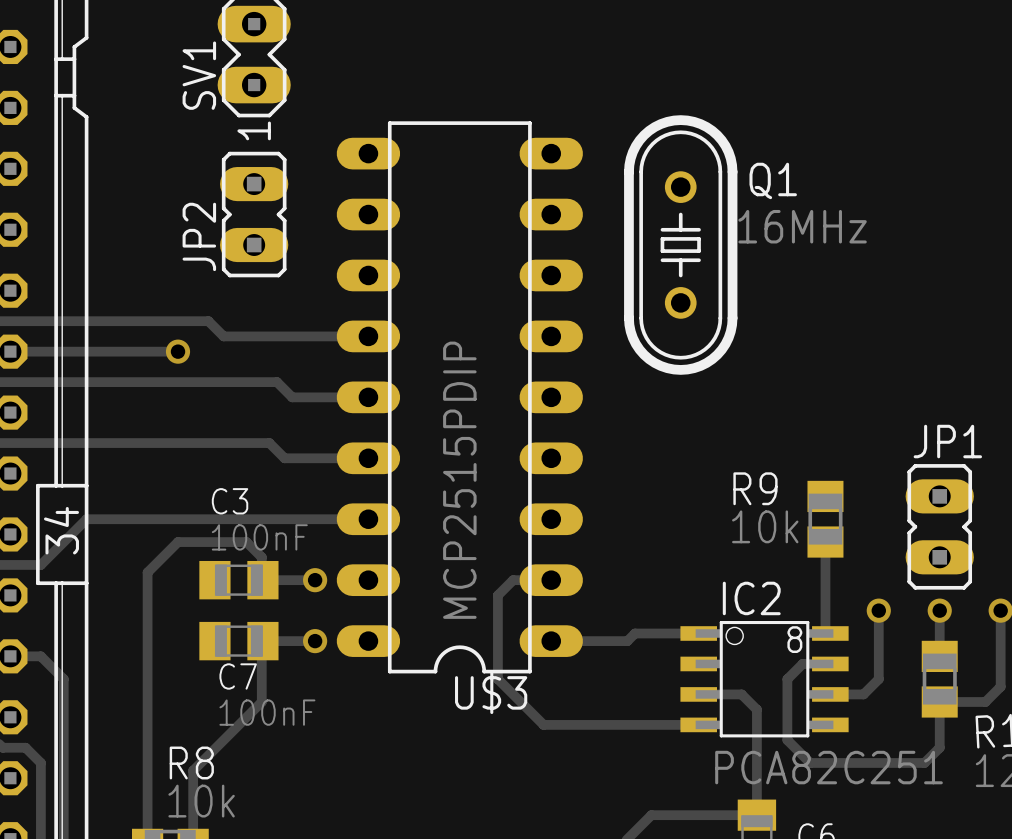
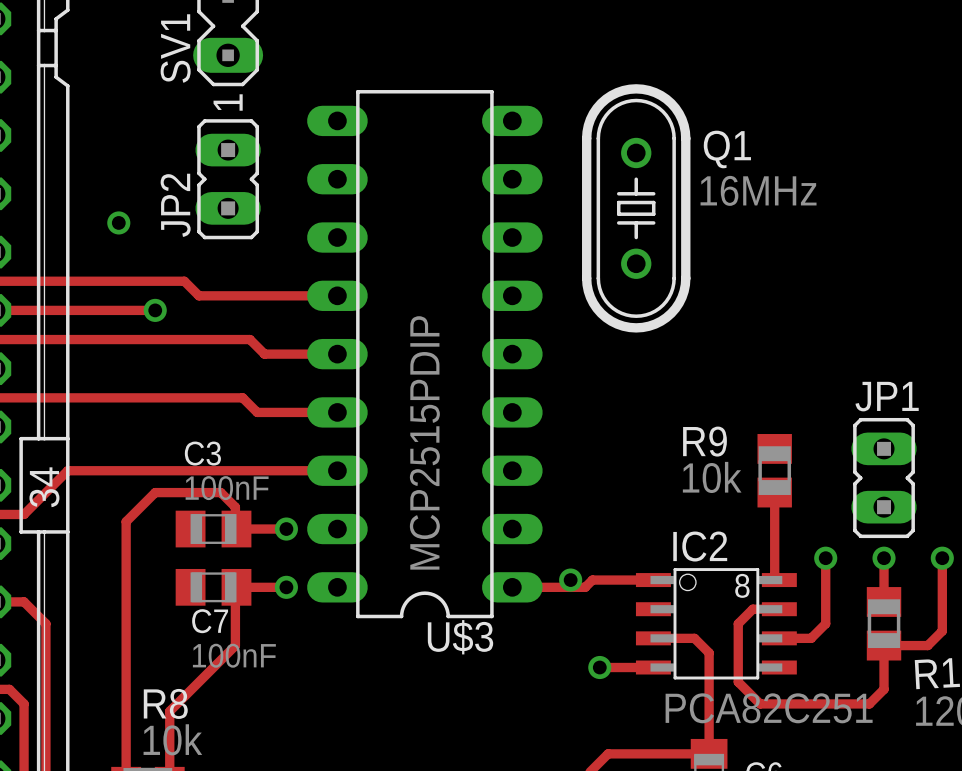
via: none -> (118, 222)
track: (551, 580) (513, 580) (497, 595) (497, 679) (543, 724) (642, 724) -> none
via: none -> (570, 580)
via: none -> (599, 667)

